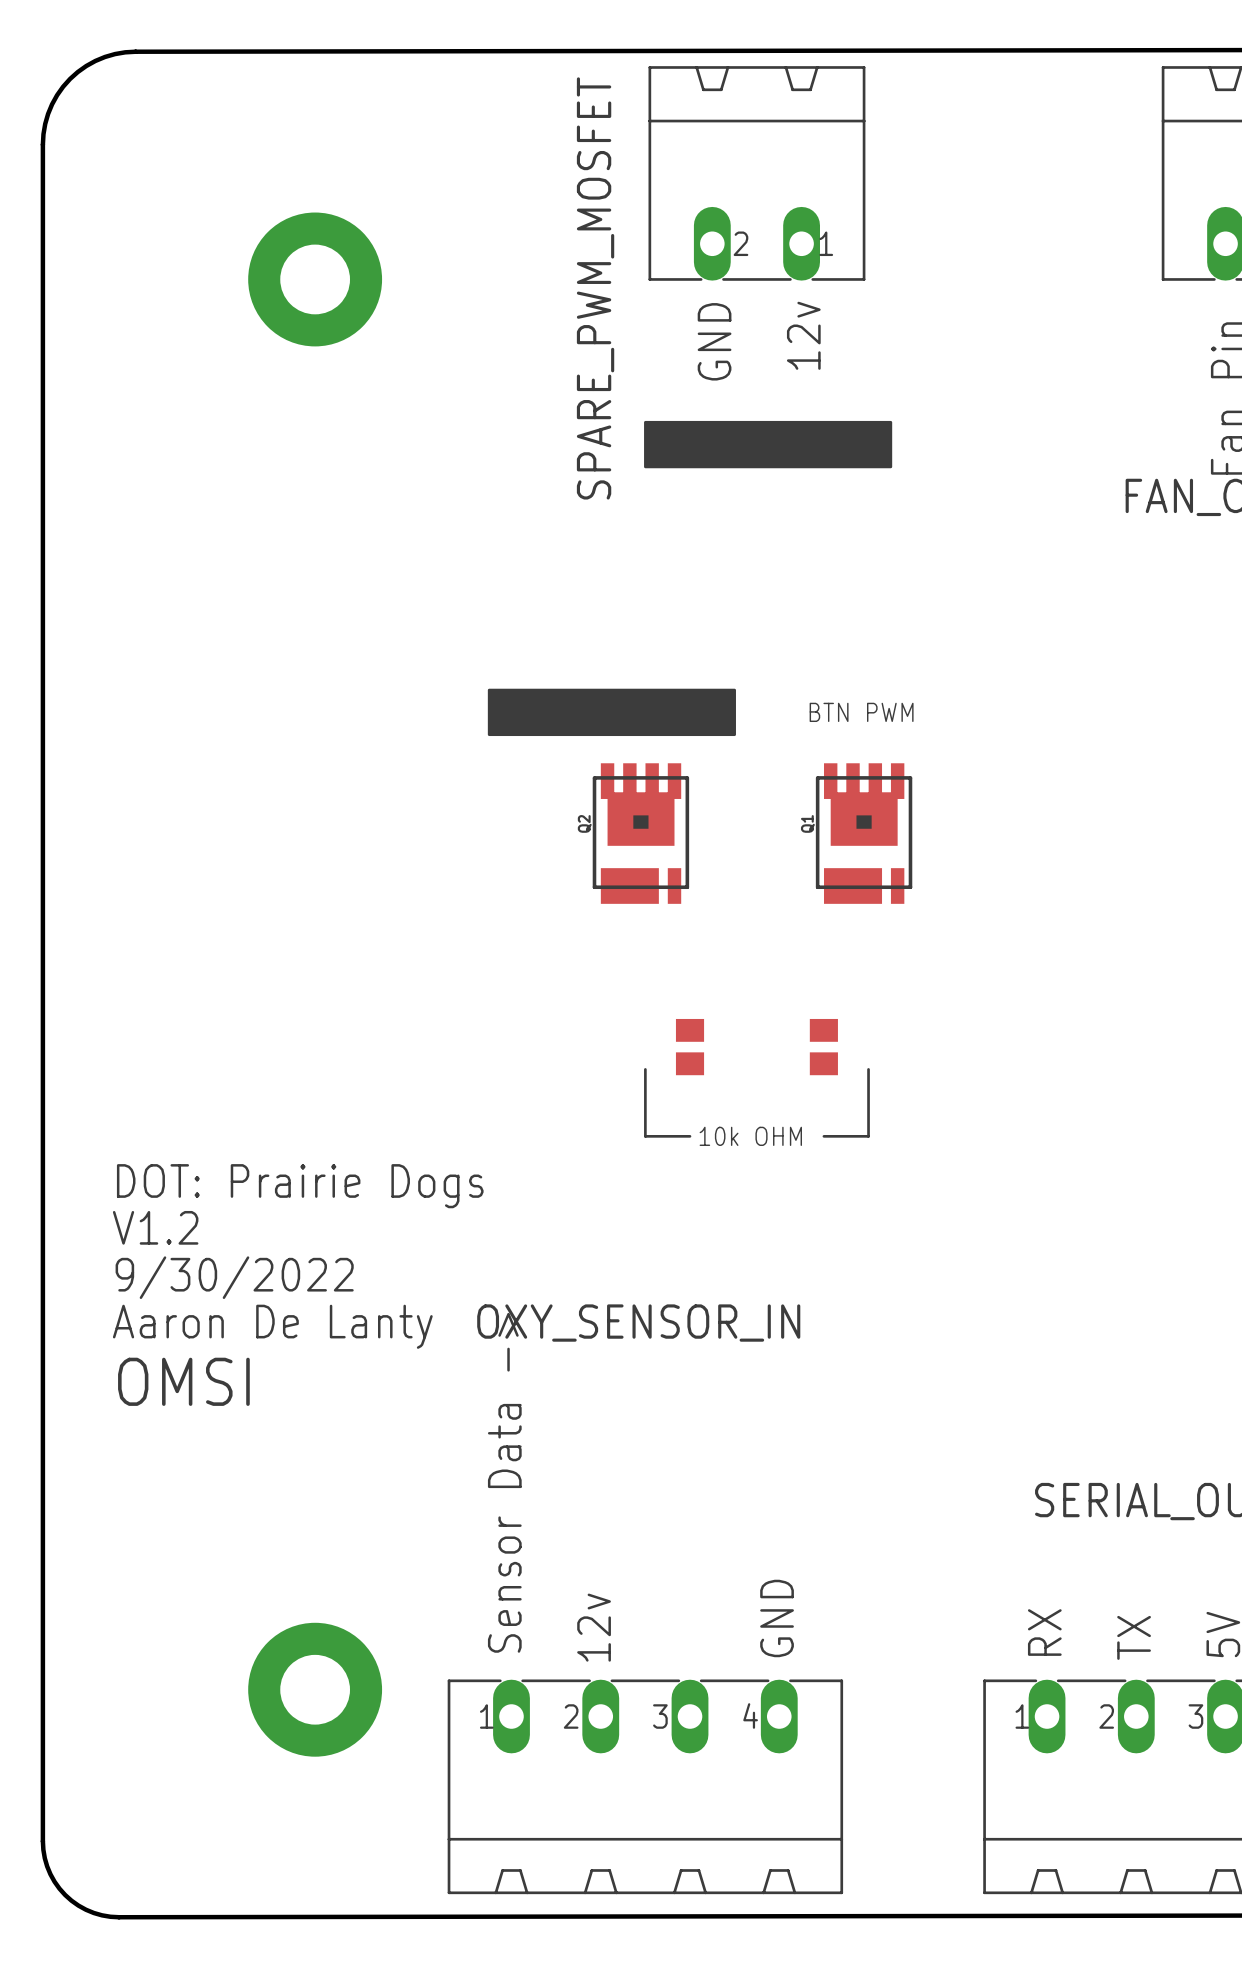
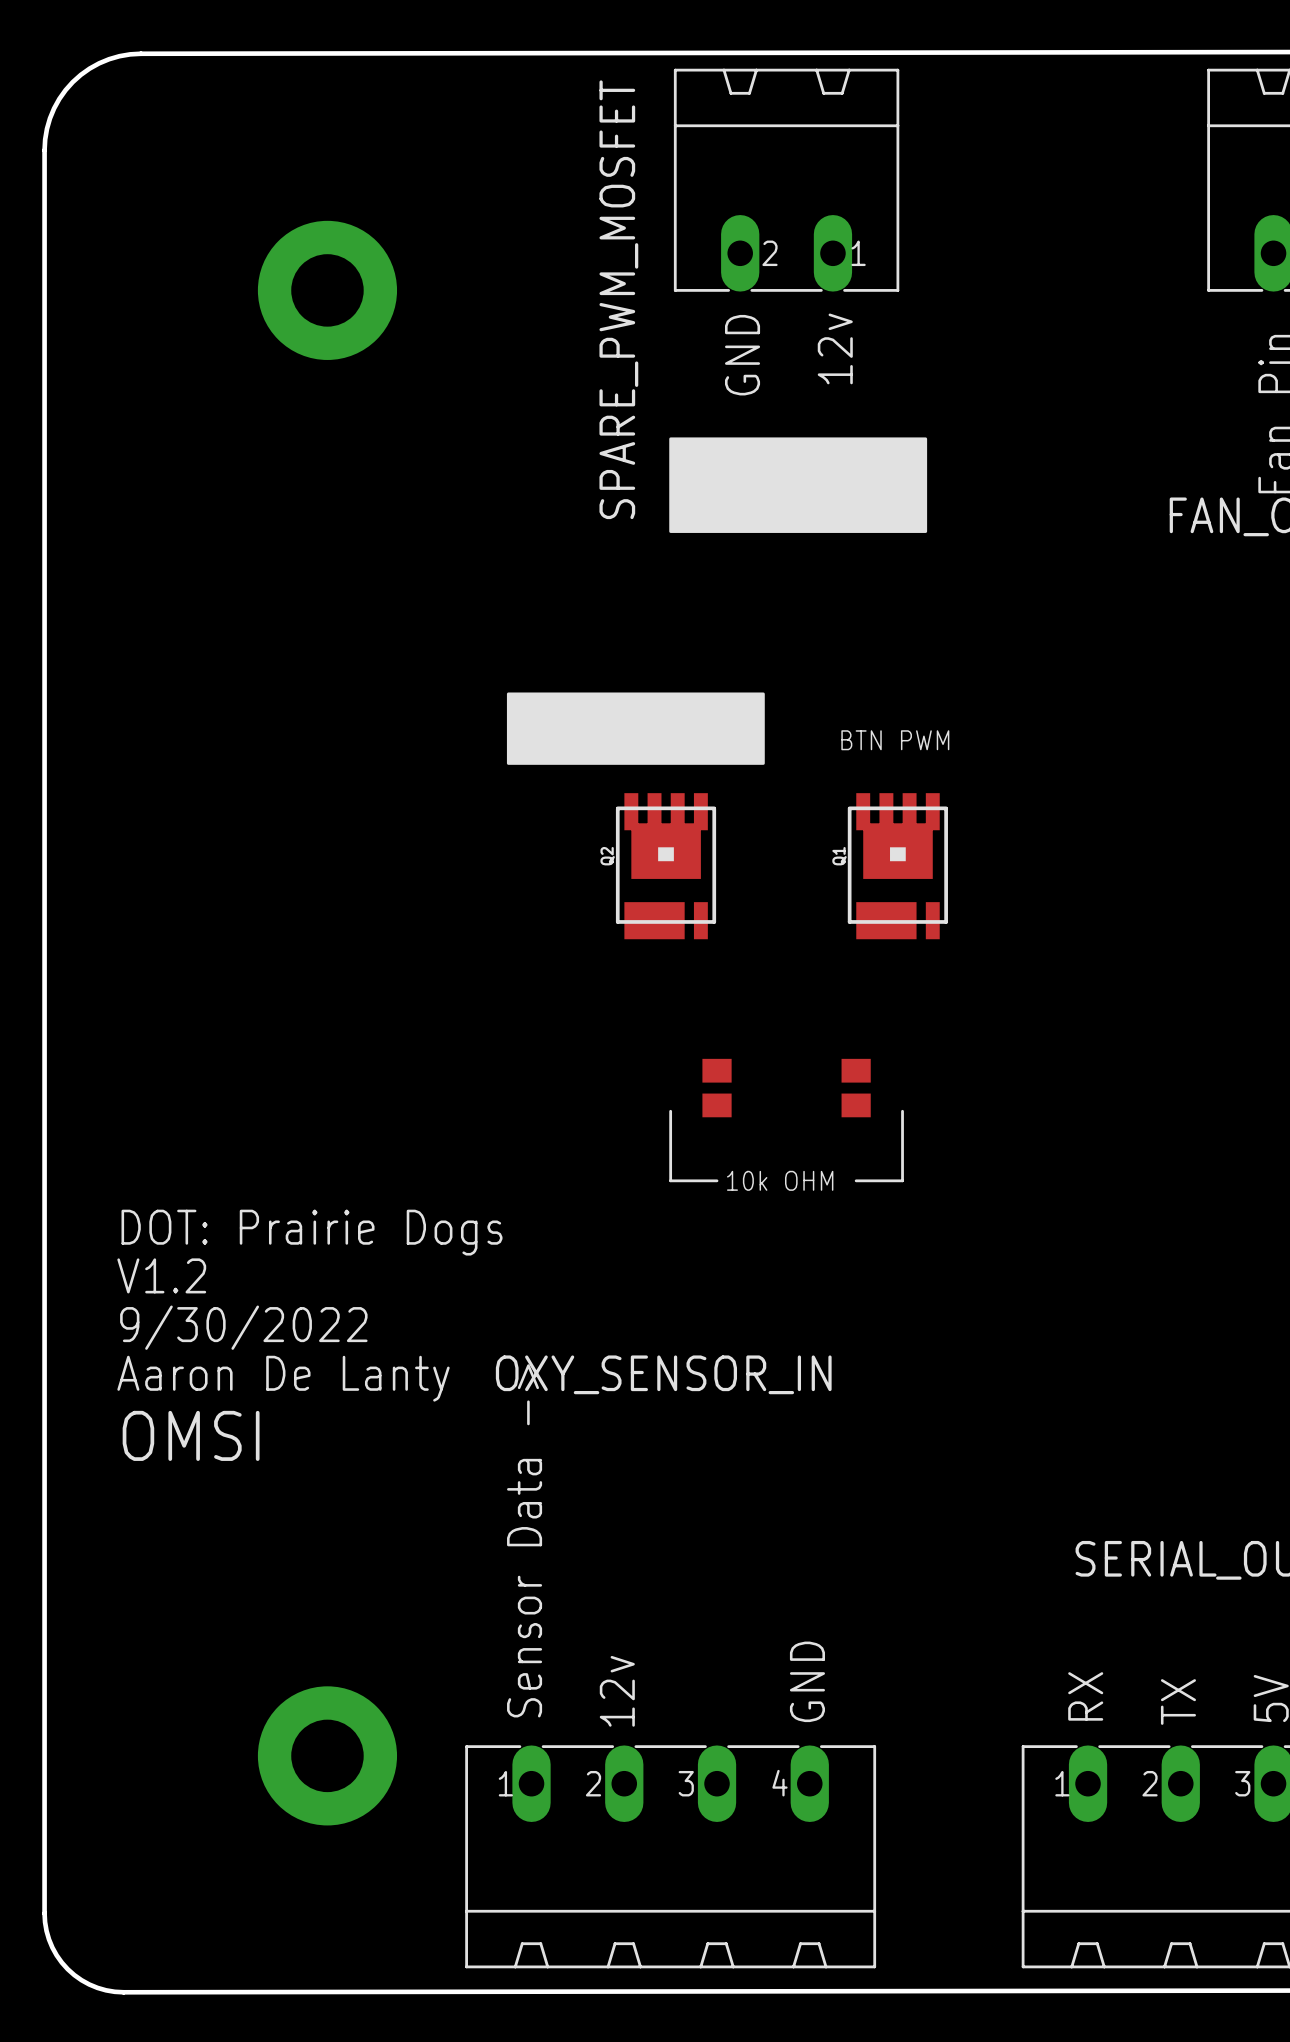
drawing: [644, 420, 893, 469] -> none
drawing: none -> [669, 437, 928, 533]
drawing shape: [487, 688, 736, 737] -> [506, 692, 765, 765]

